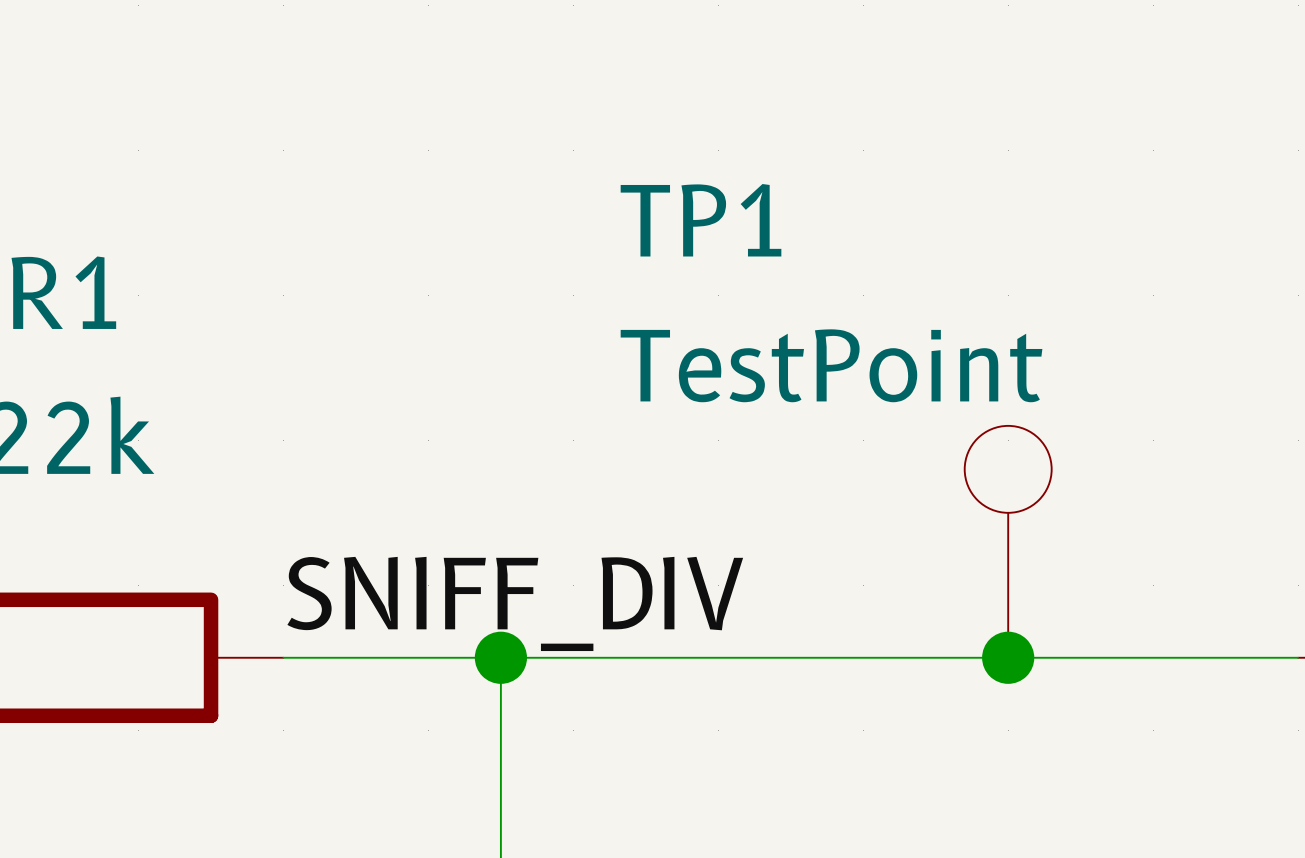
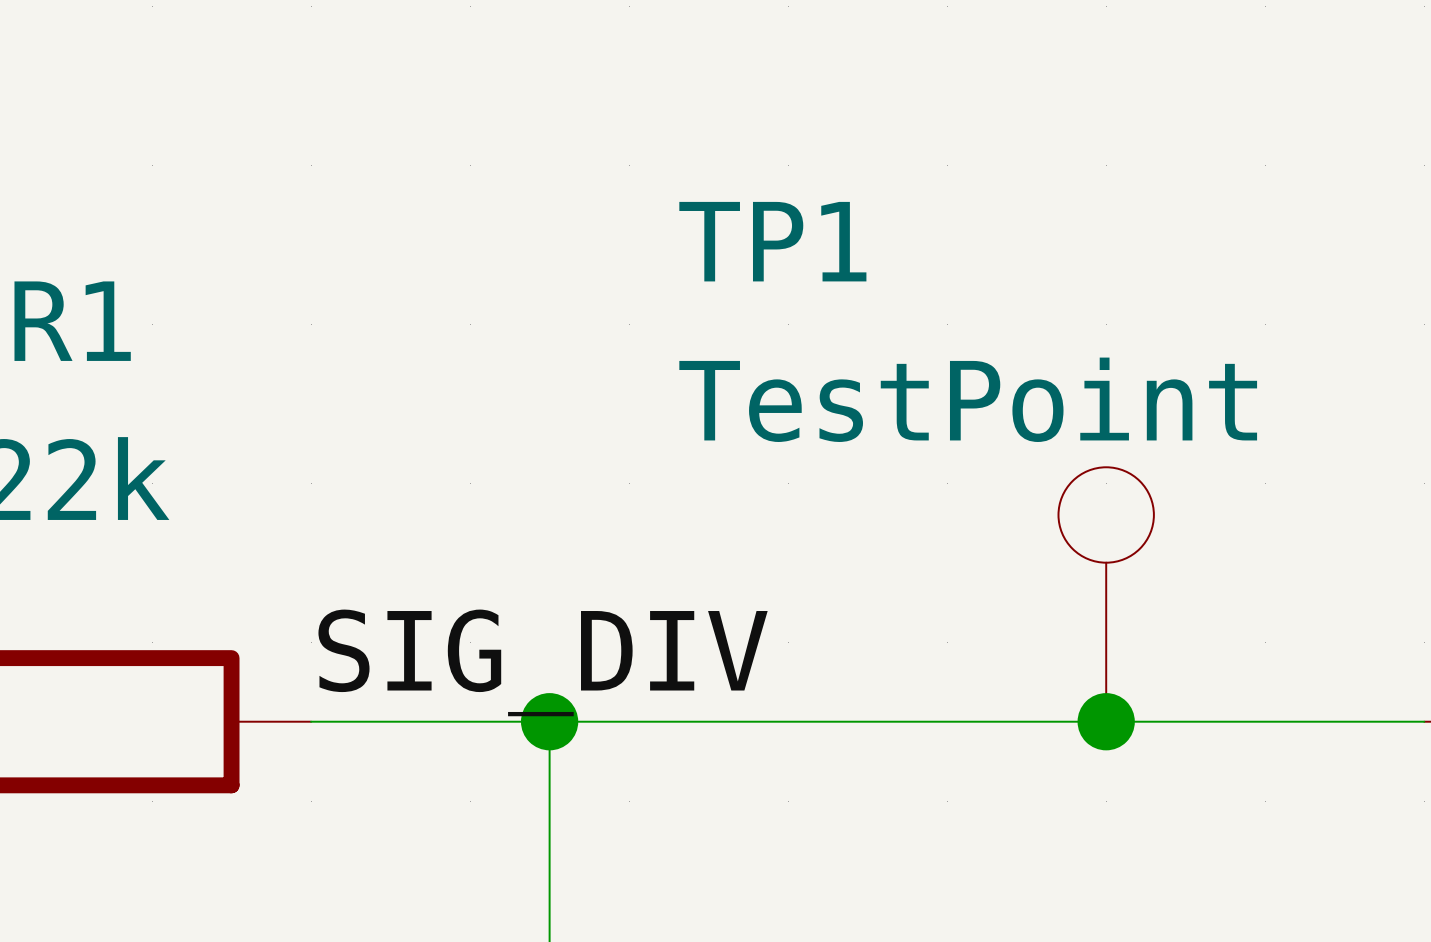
label: SNIFF_DIV (515, 603) -> SIG_DIV (543, 662)

